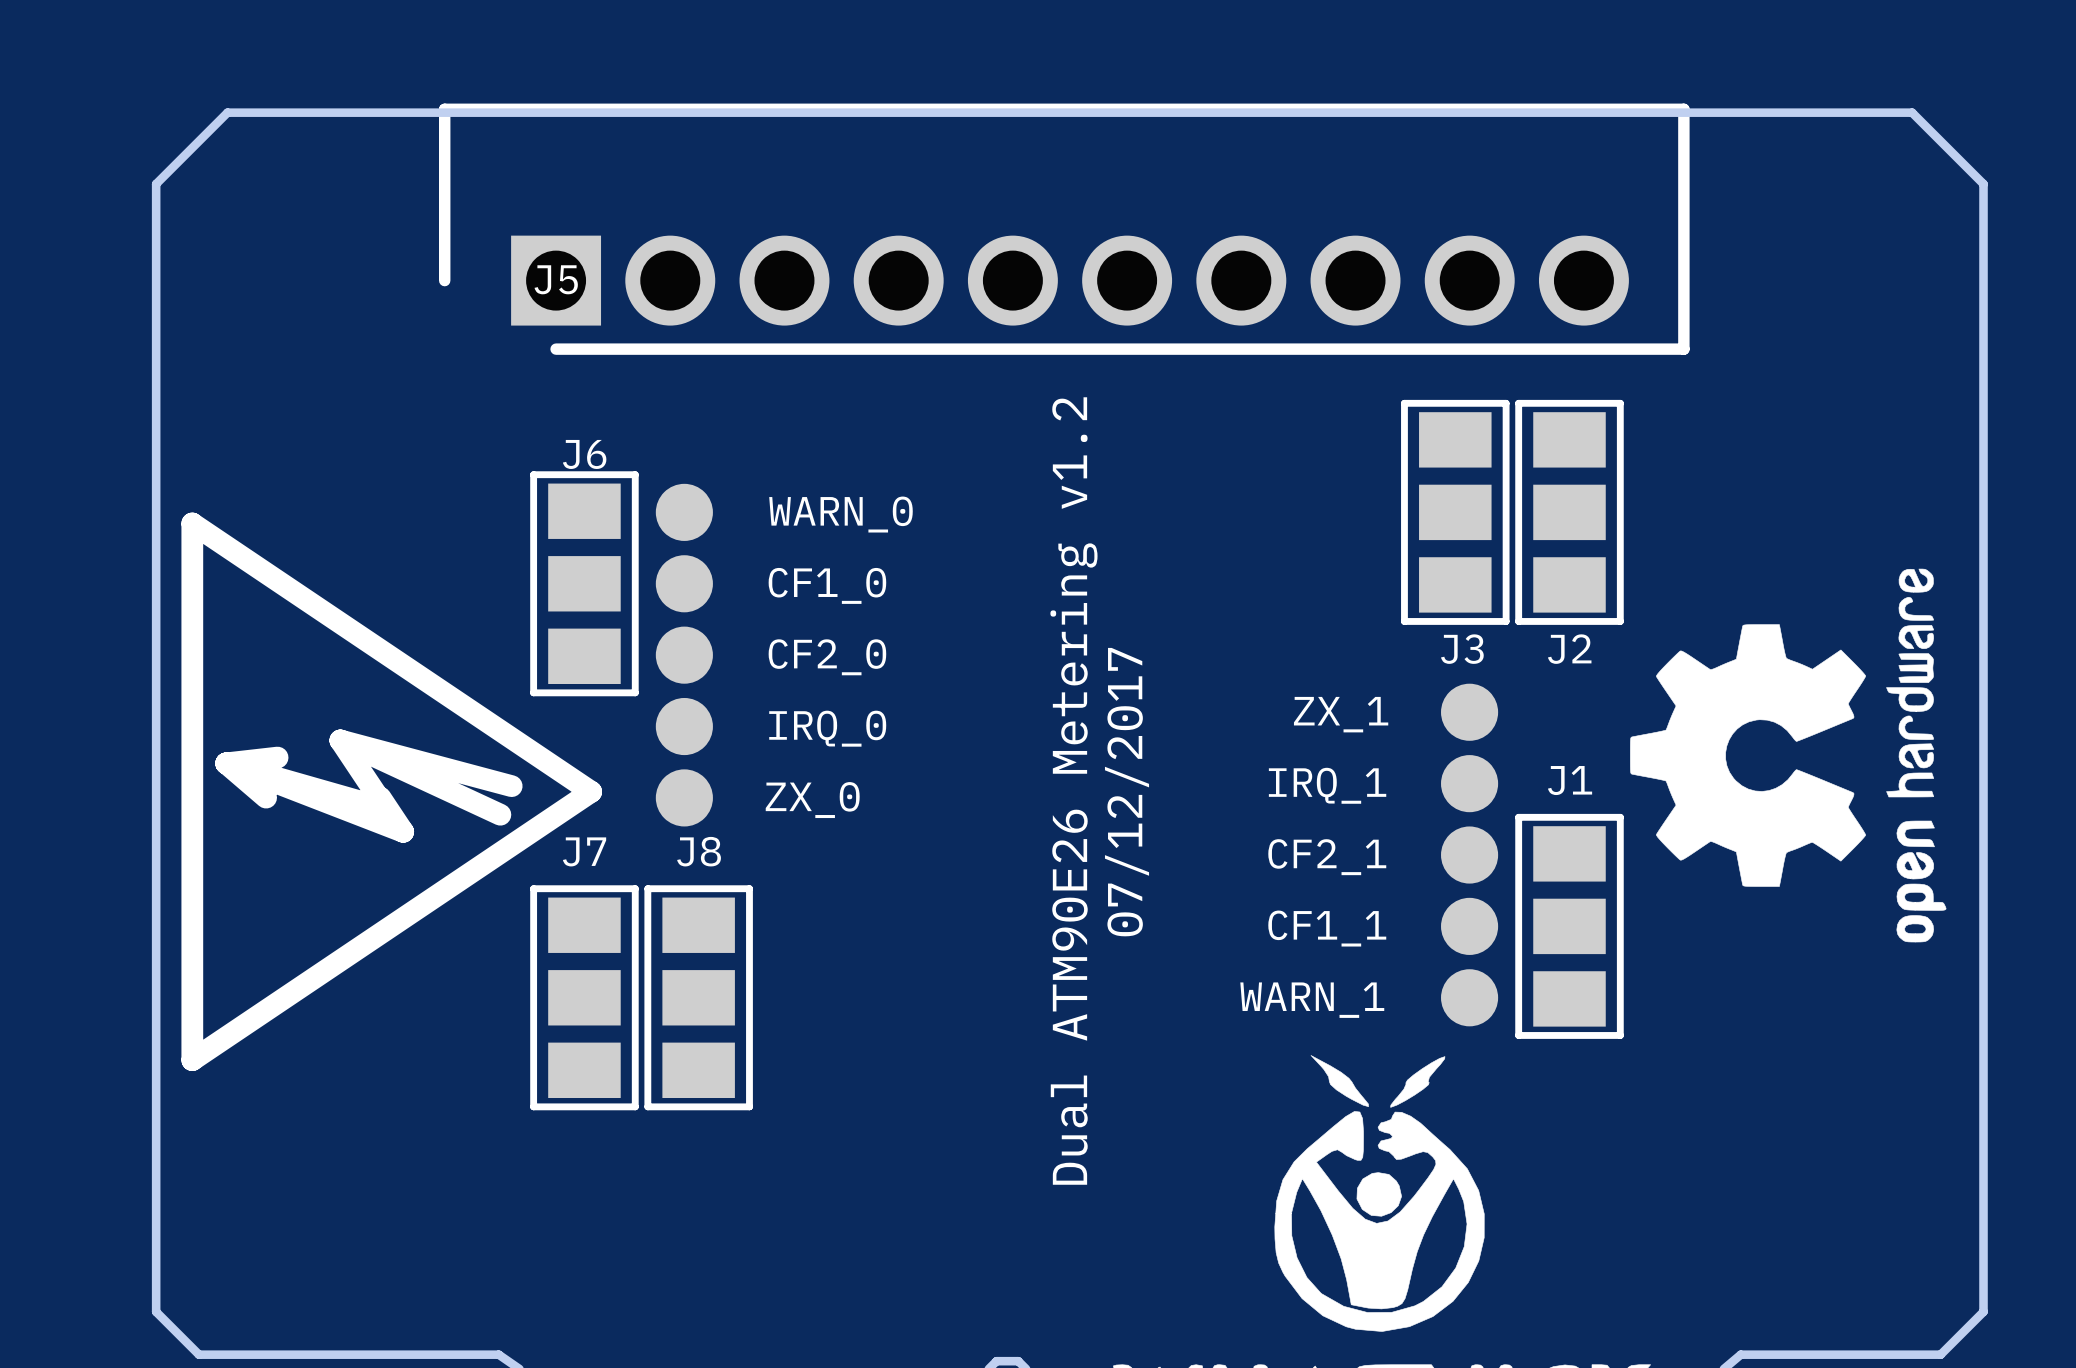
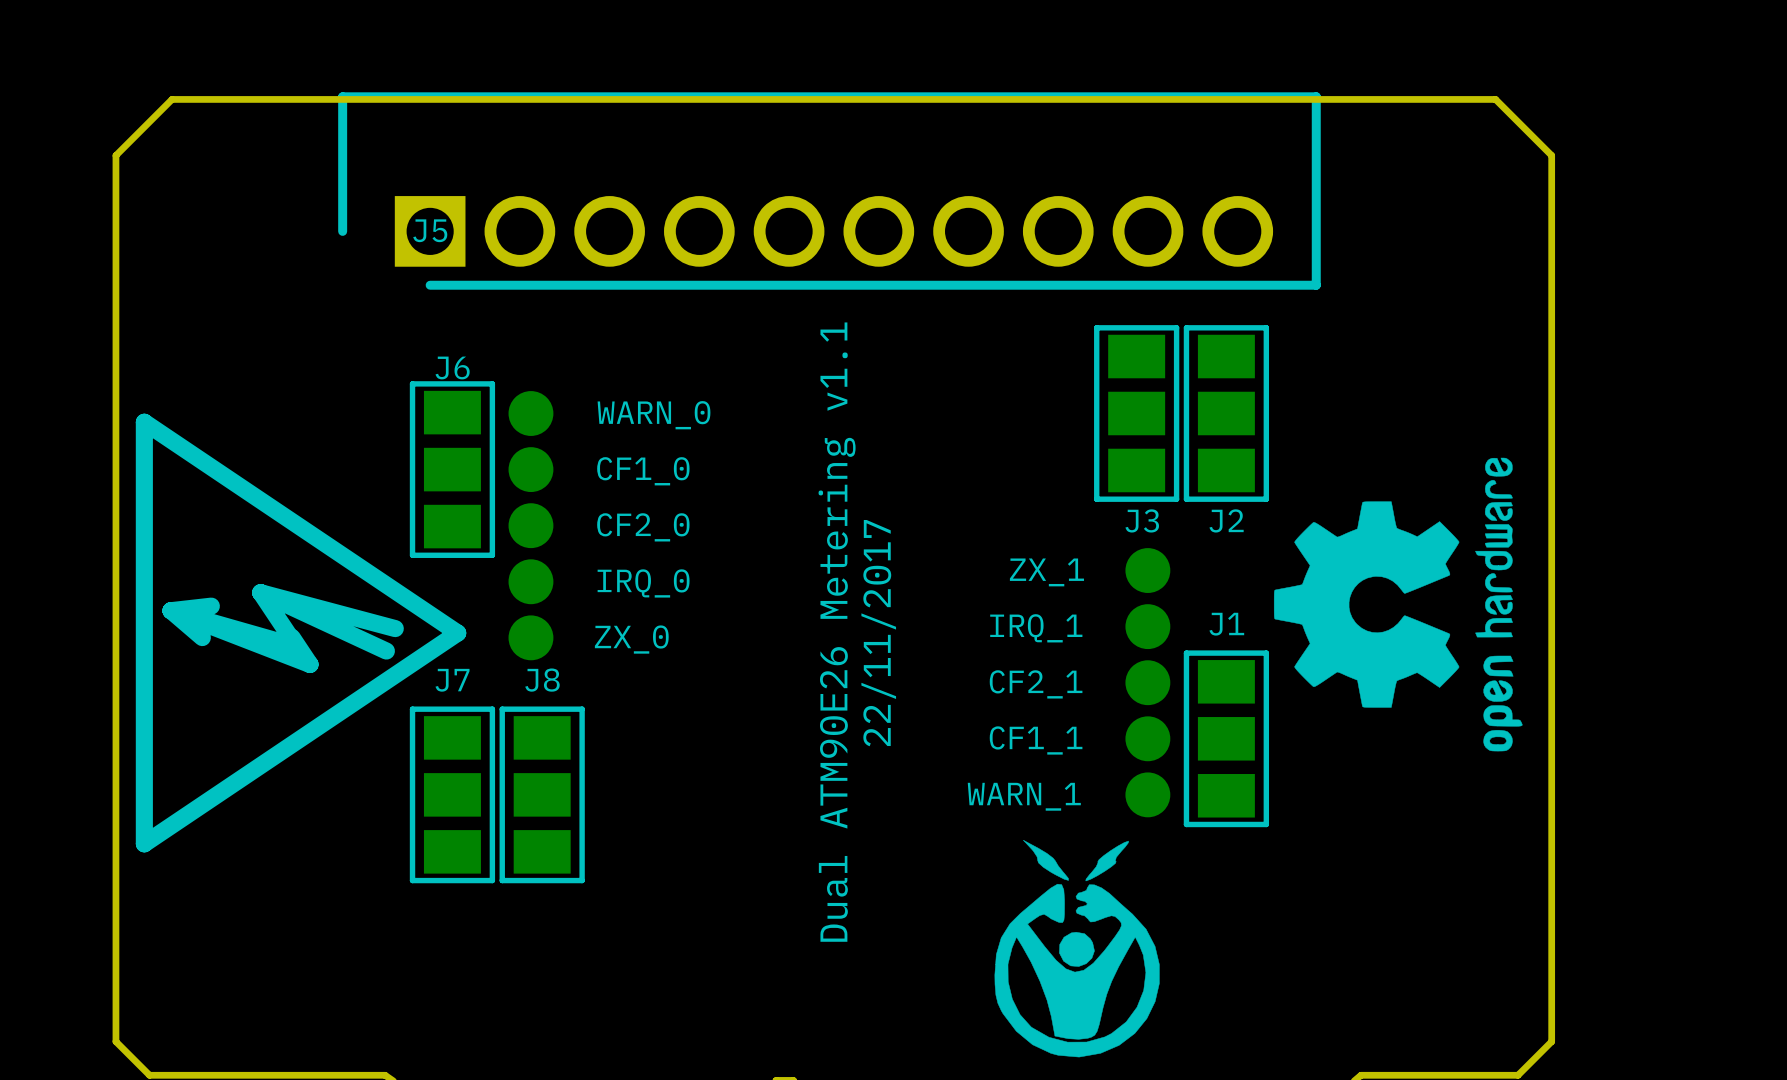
text: Dual ATM90E26 Metering v1.2 (1073, 791) -> Dual ATM90E26 Metering v1.1 (837, 632)
text: 07/12/2017 (1127, 792) -> 22/11/2017 (878, 633)

